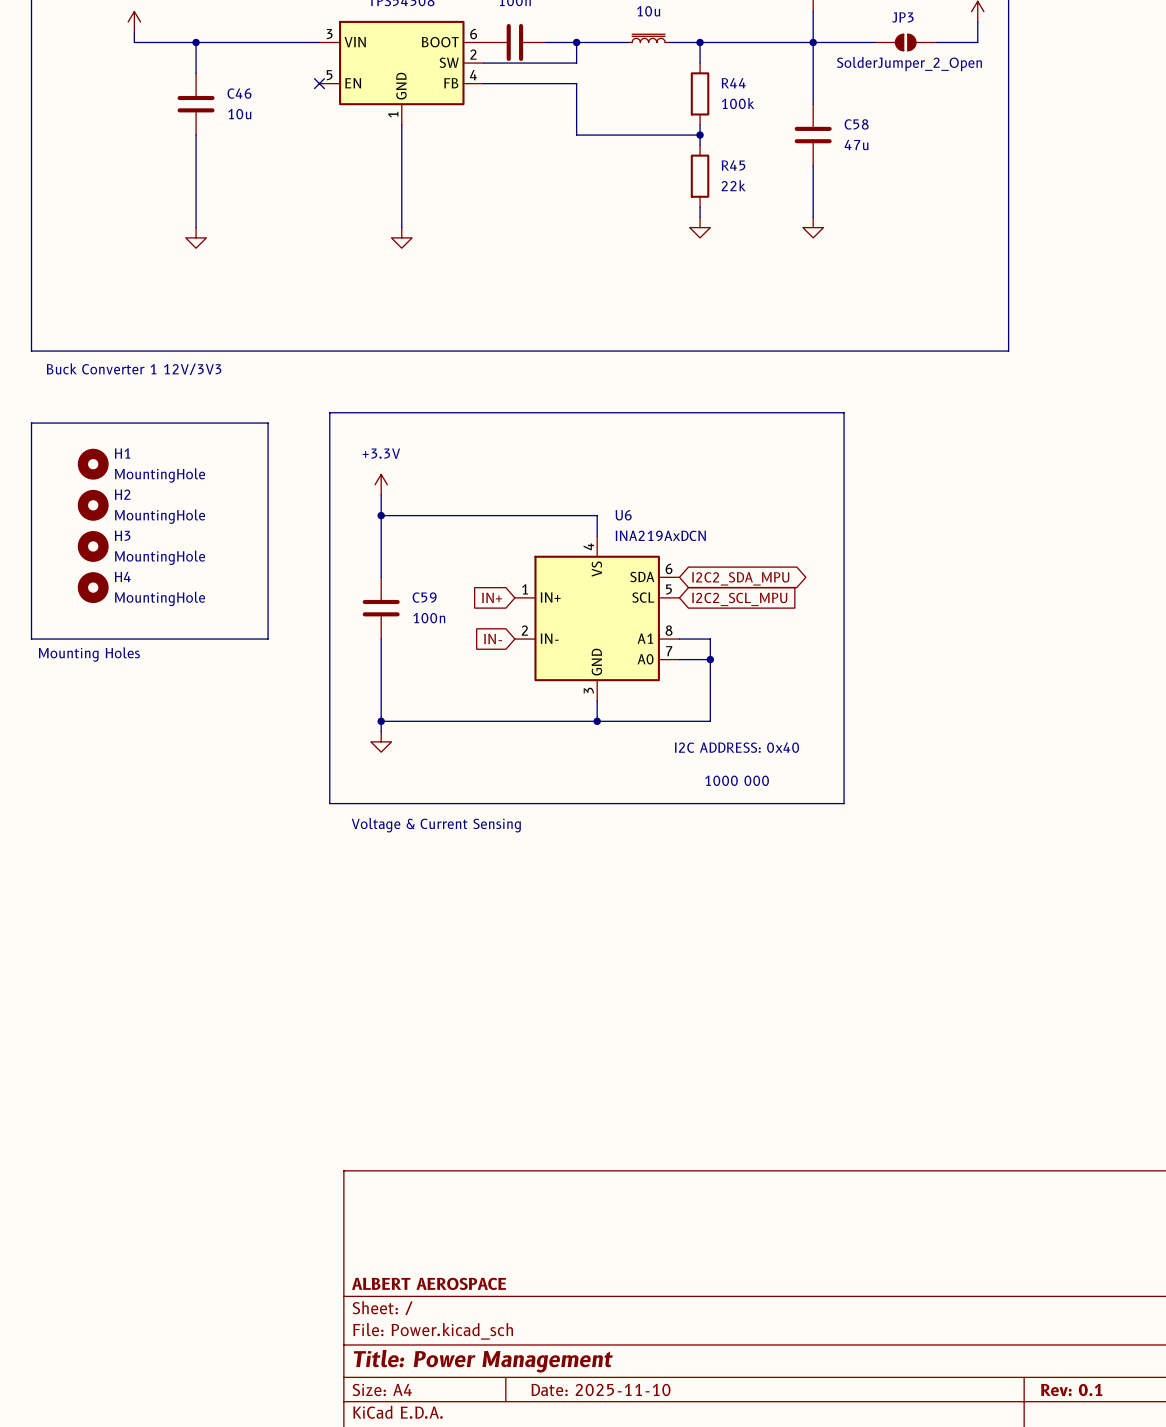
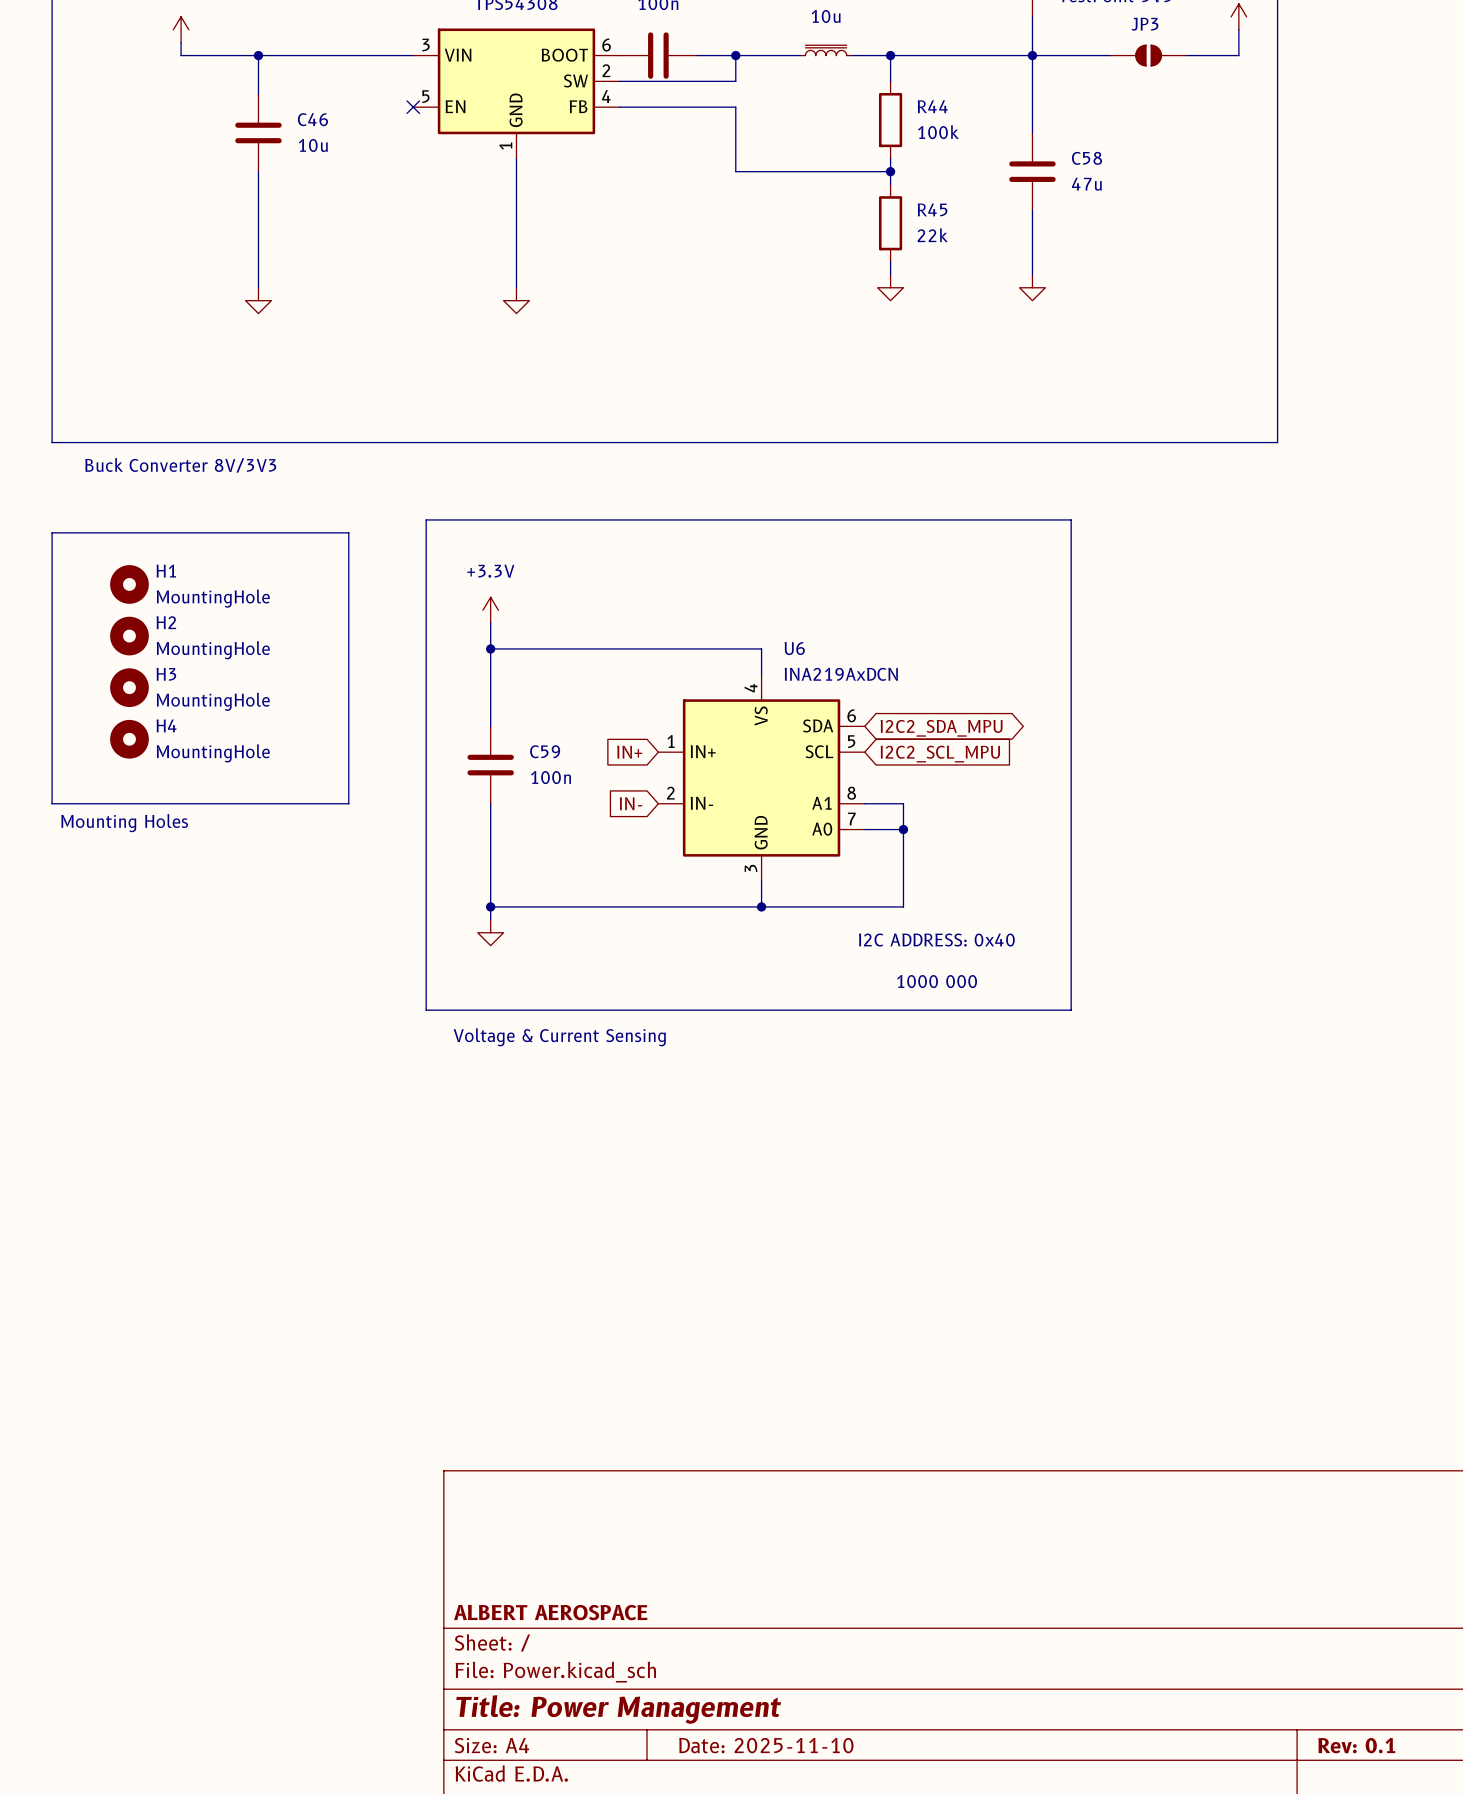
JP3 value: SolderJumper_2_Open (909, 64) -> none
text: Buck Converter 1 12V/3V3 (134, 369) -> Buck Converter 8V/3V3 (180, 465)

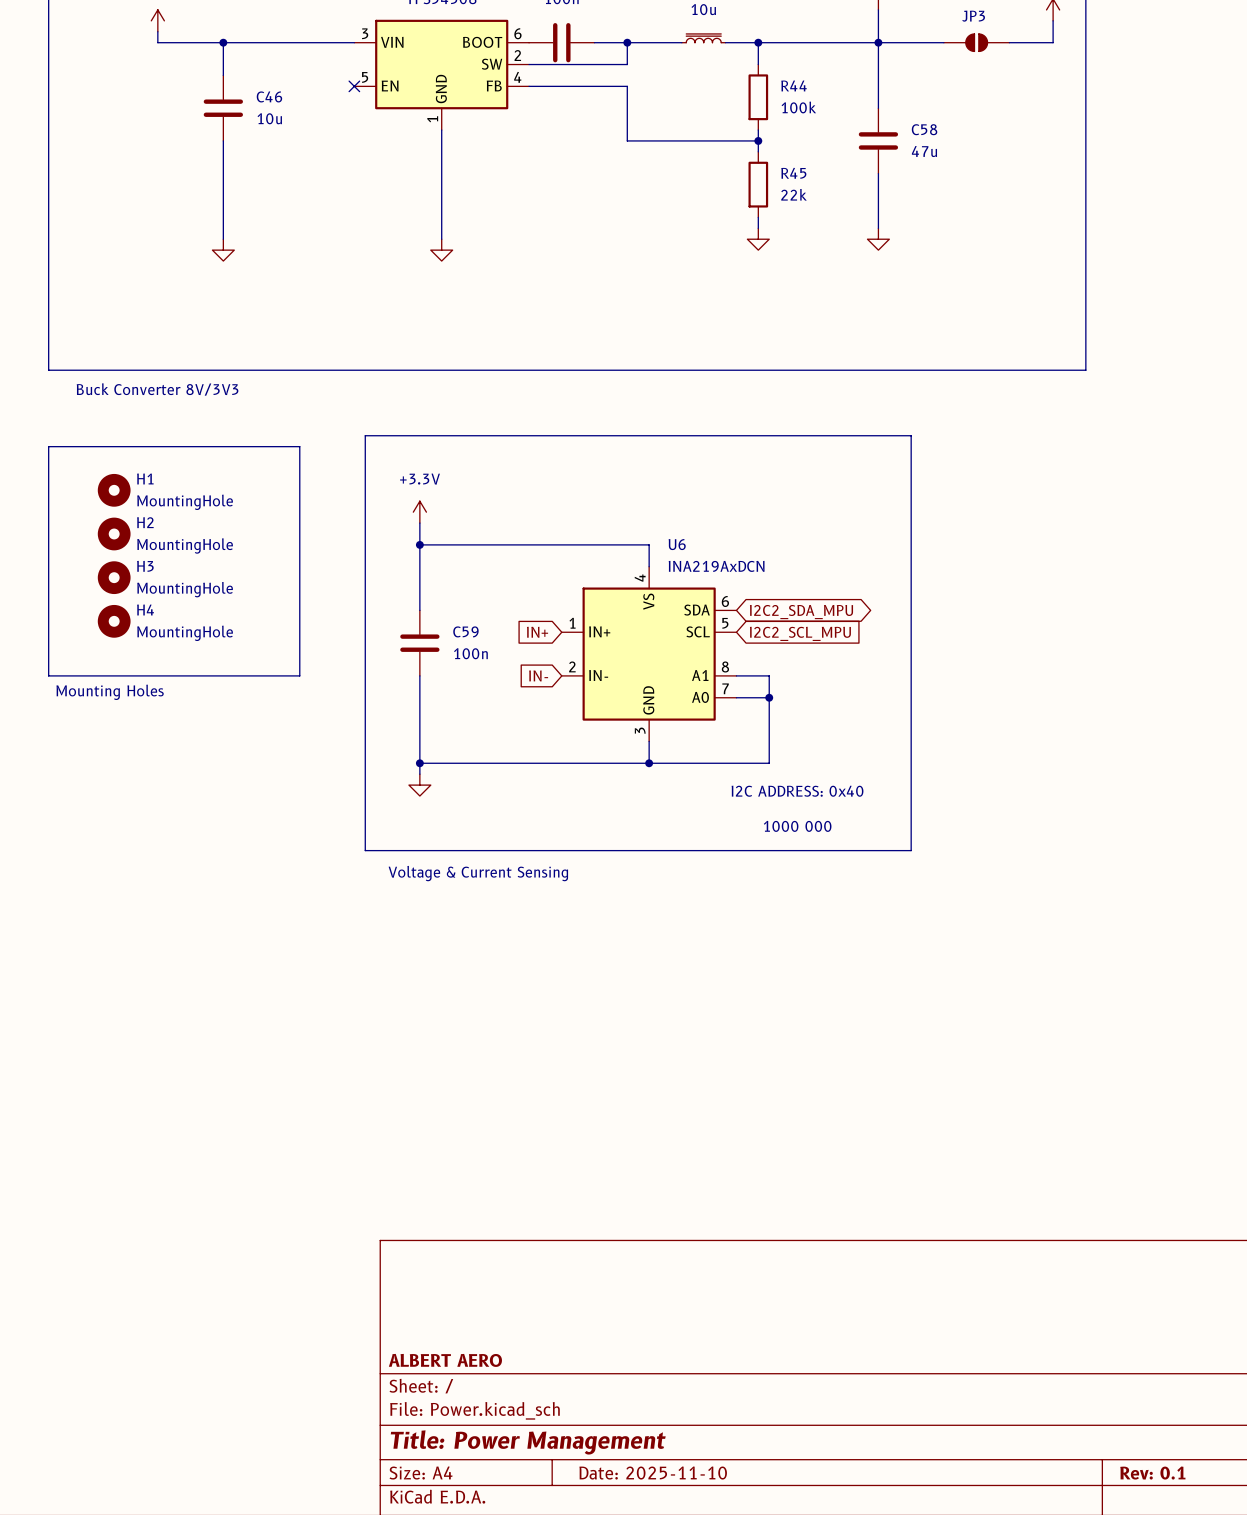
title block: ALBERT AEROSPACE (550, 1612) -> ALBERT AERO (445, 1360)

